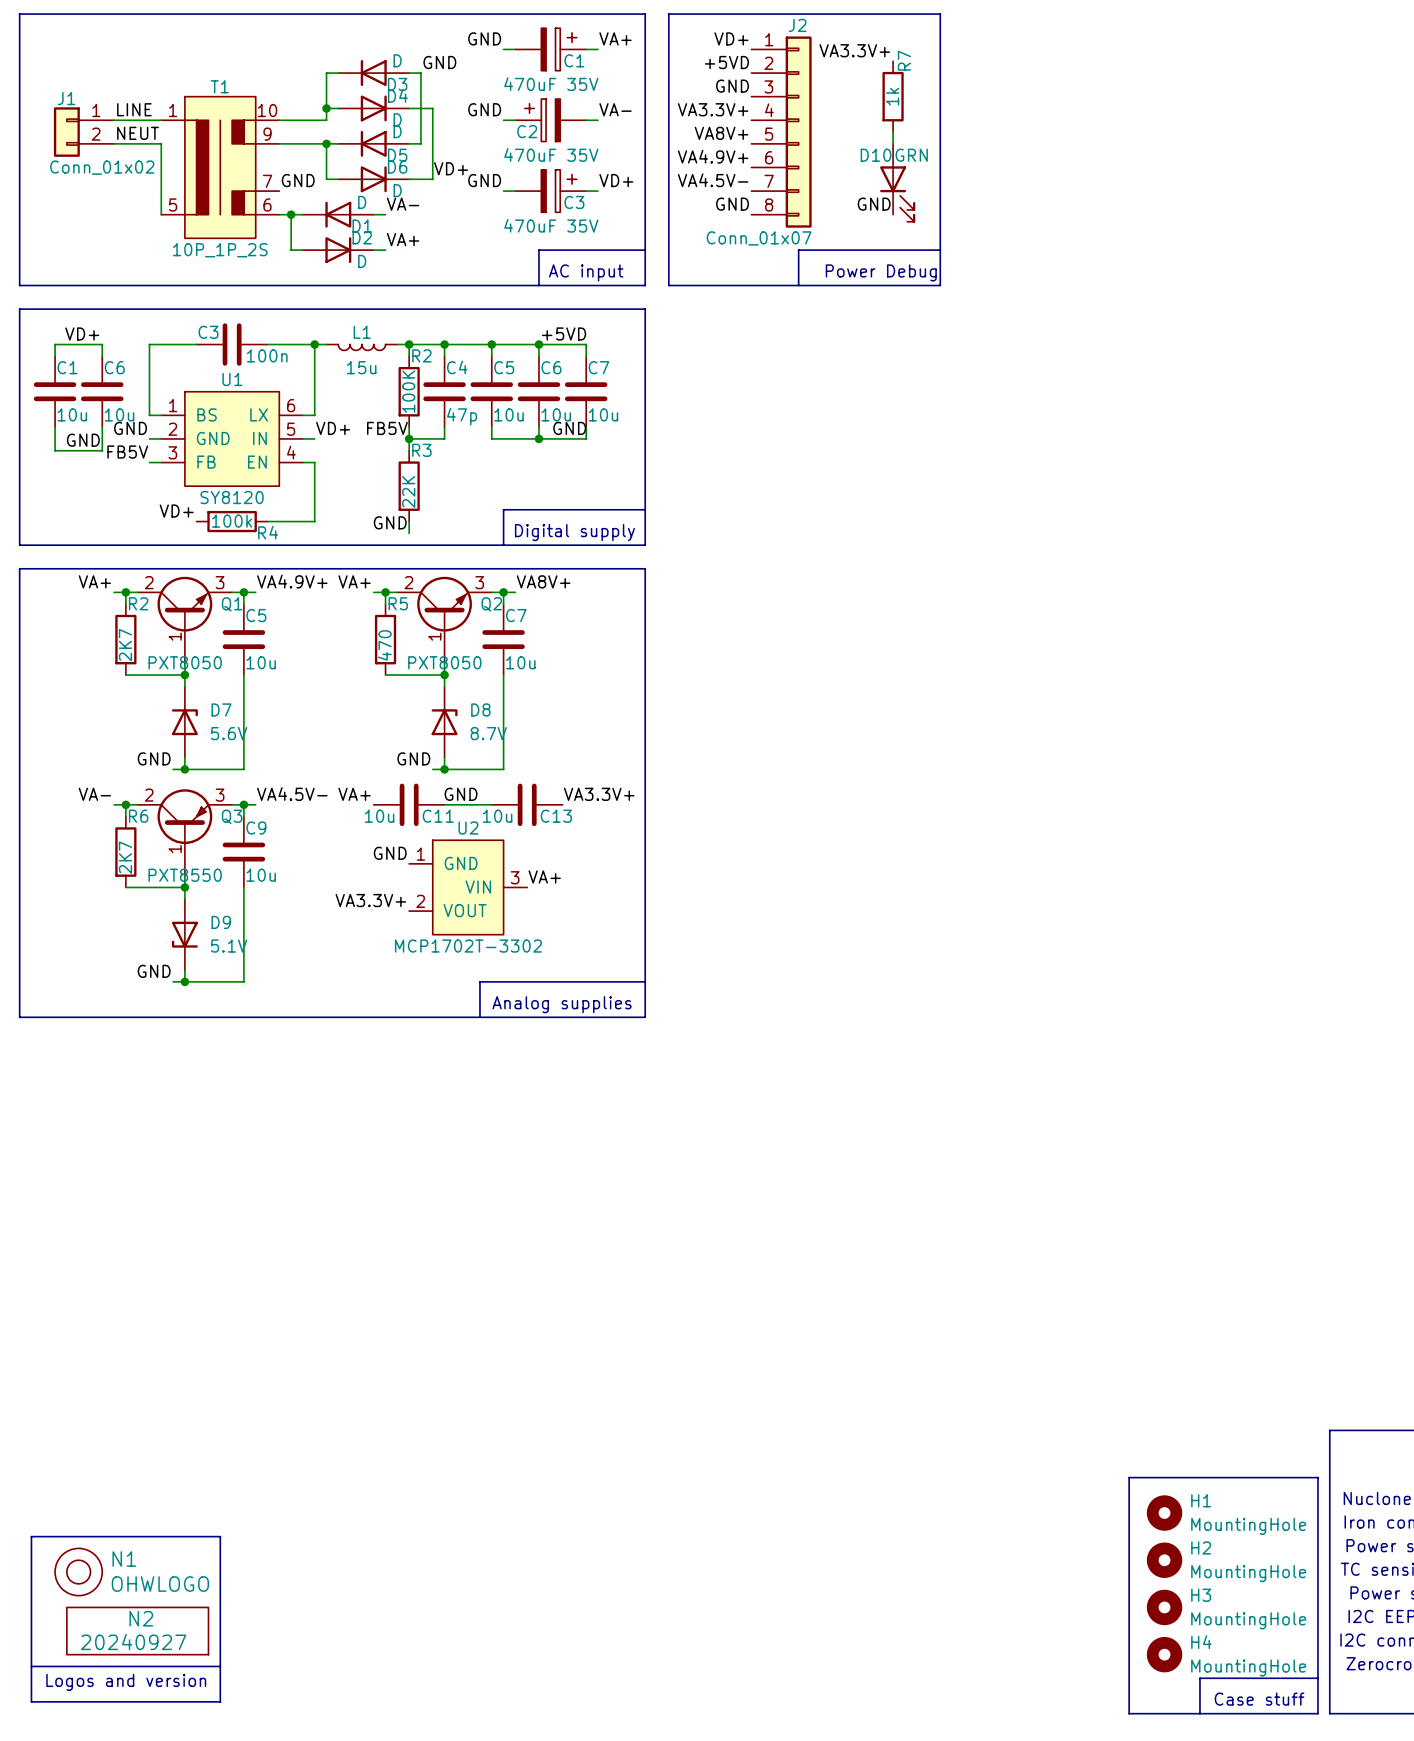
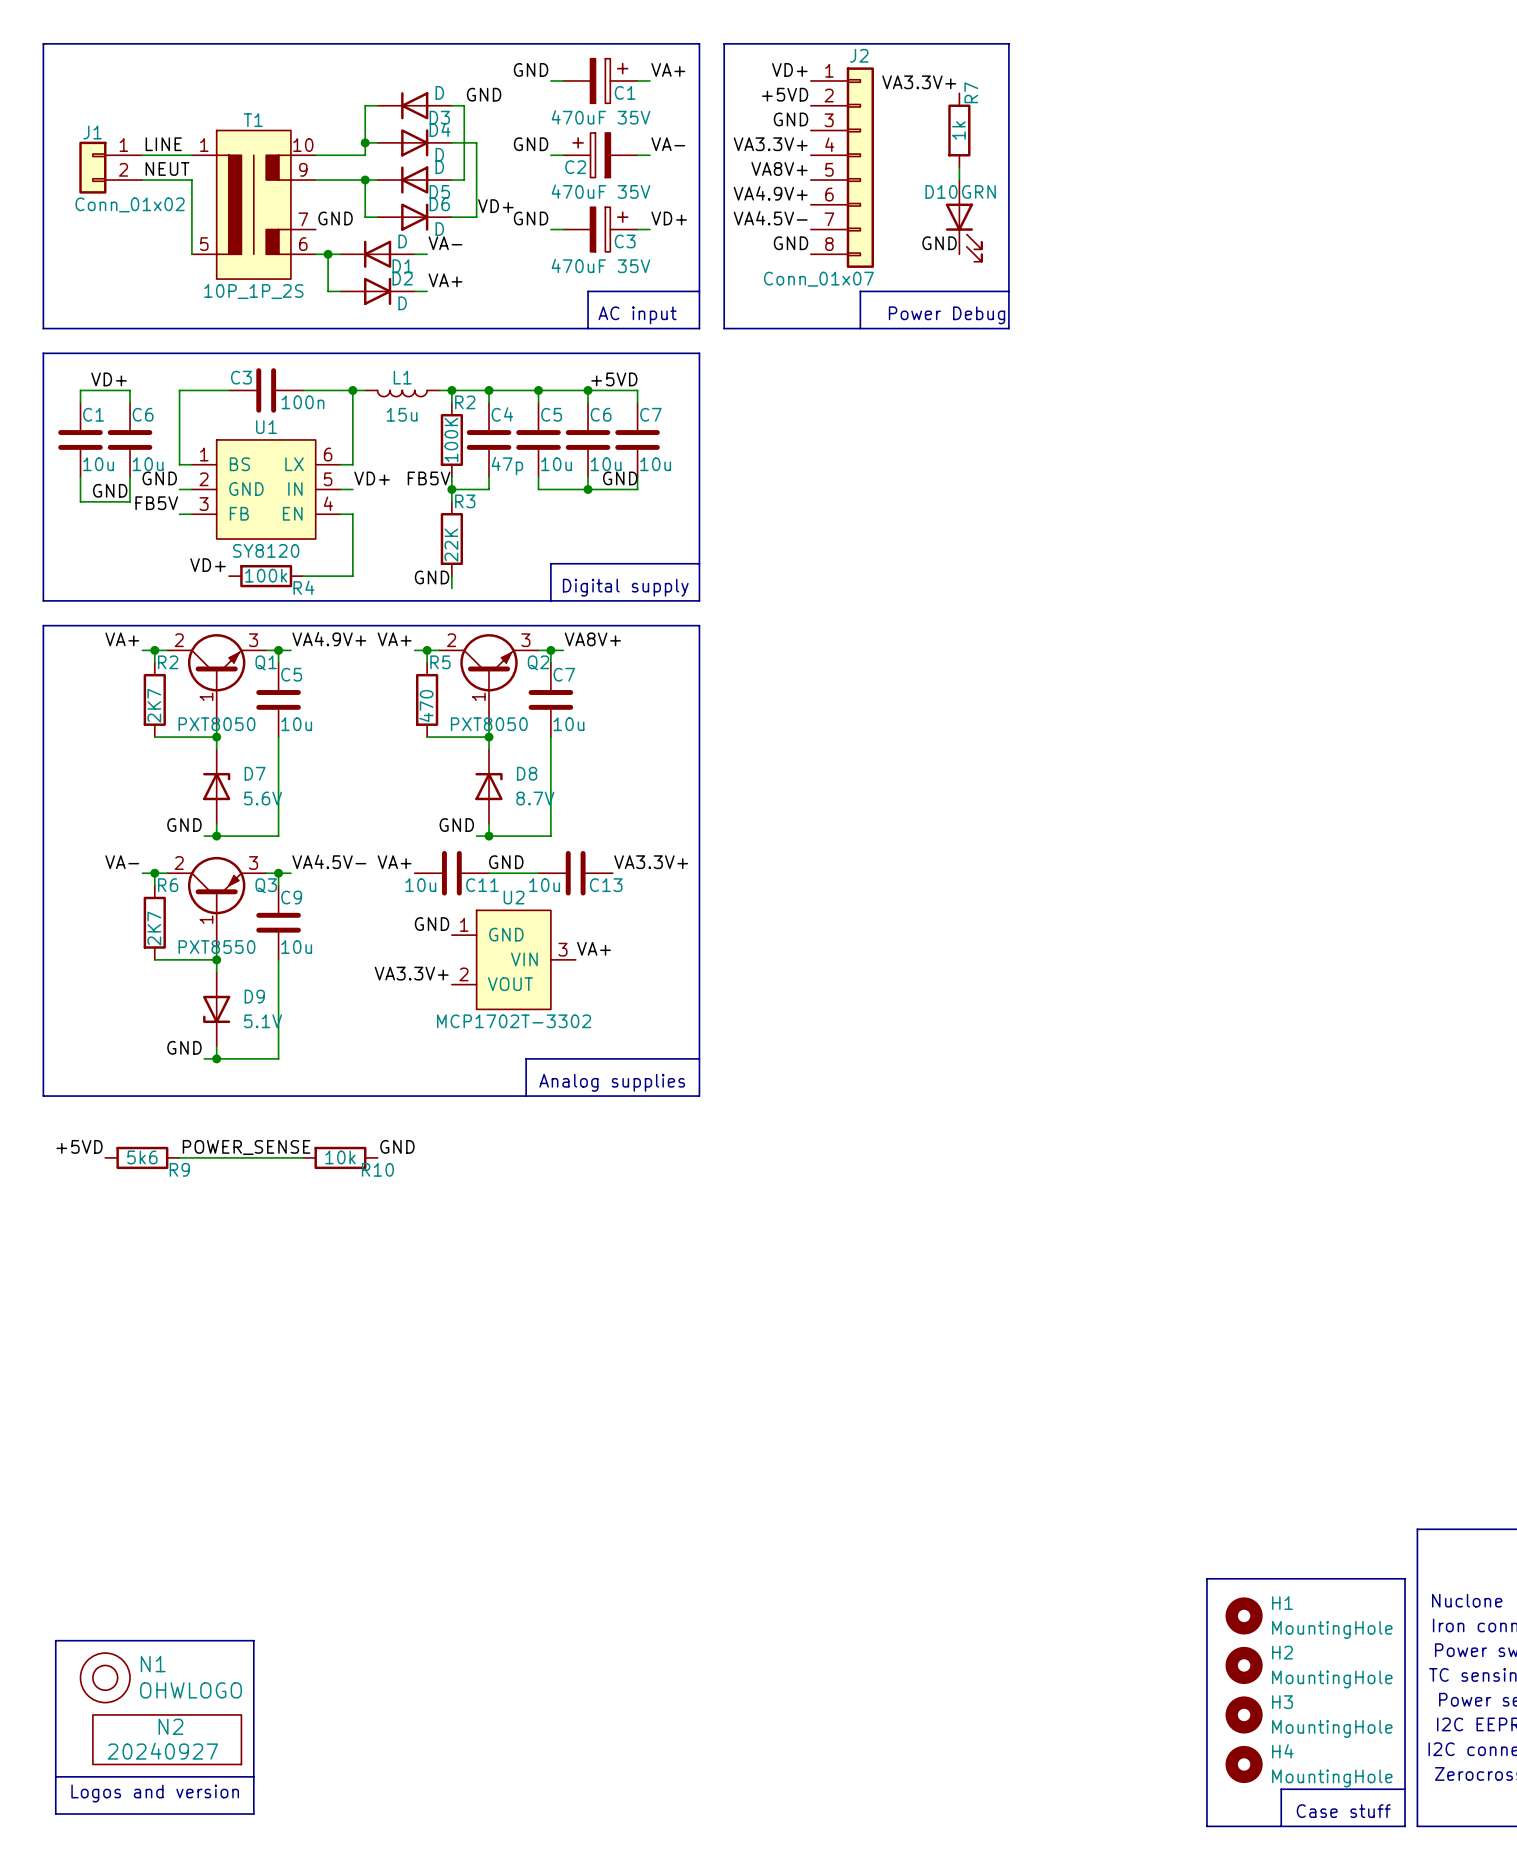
label: none -> +5VD (79, 1146)
label: none -> GND (397, 1146)
label: none -> POWER_SENSE (246, 1147)
R9: none -> 5k6 (142, 1157)
wire: none -> (179, 1157) (303, 1157)
R10: none -> 10k (340, 1157)

